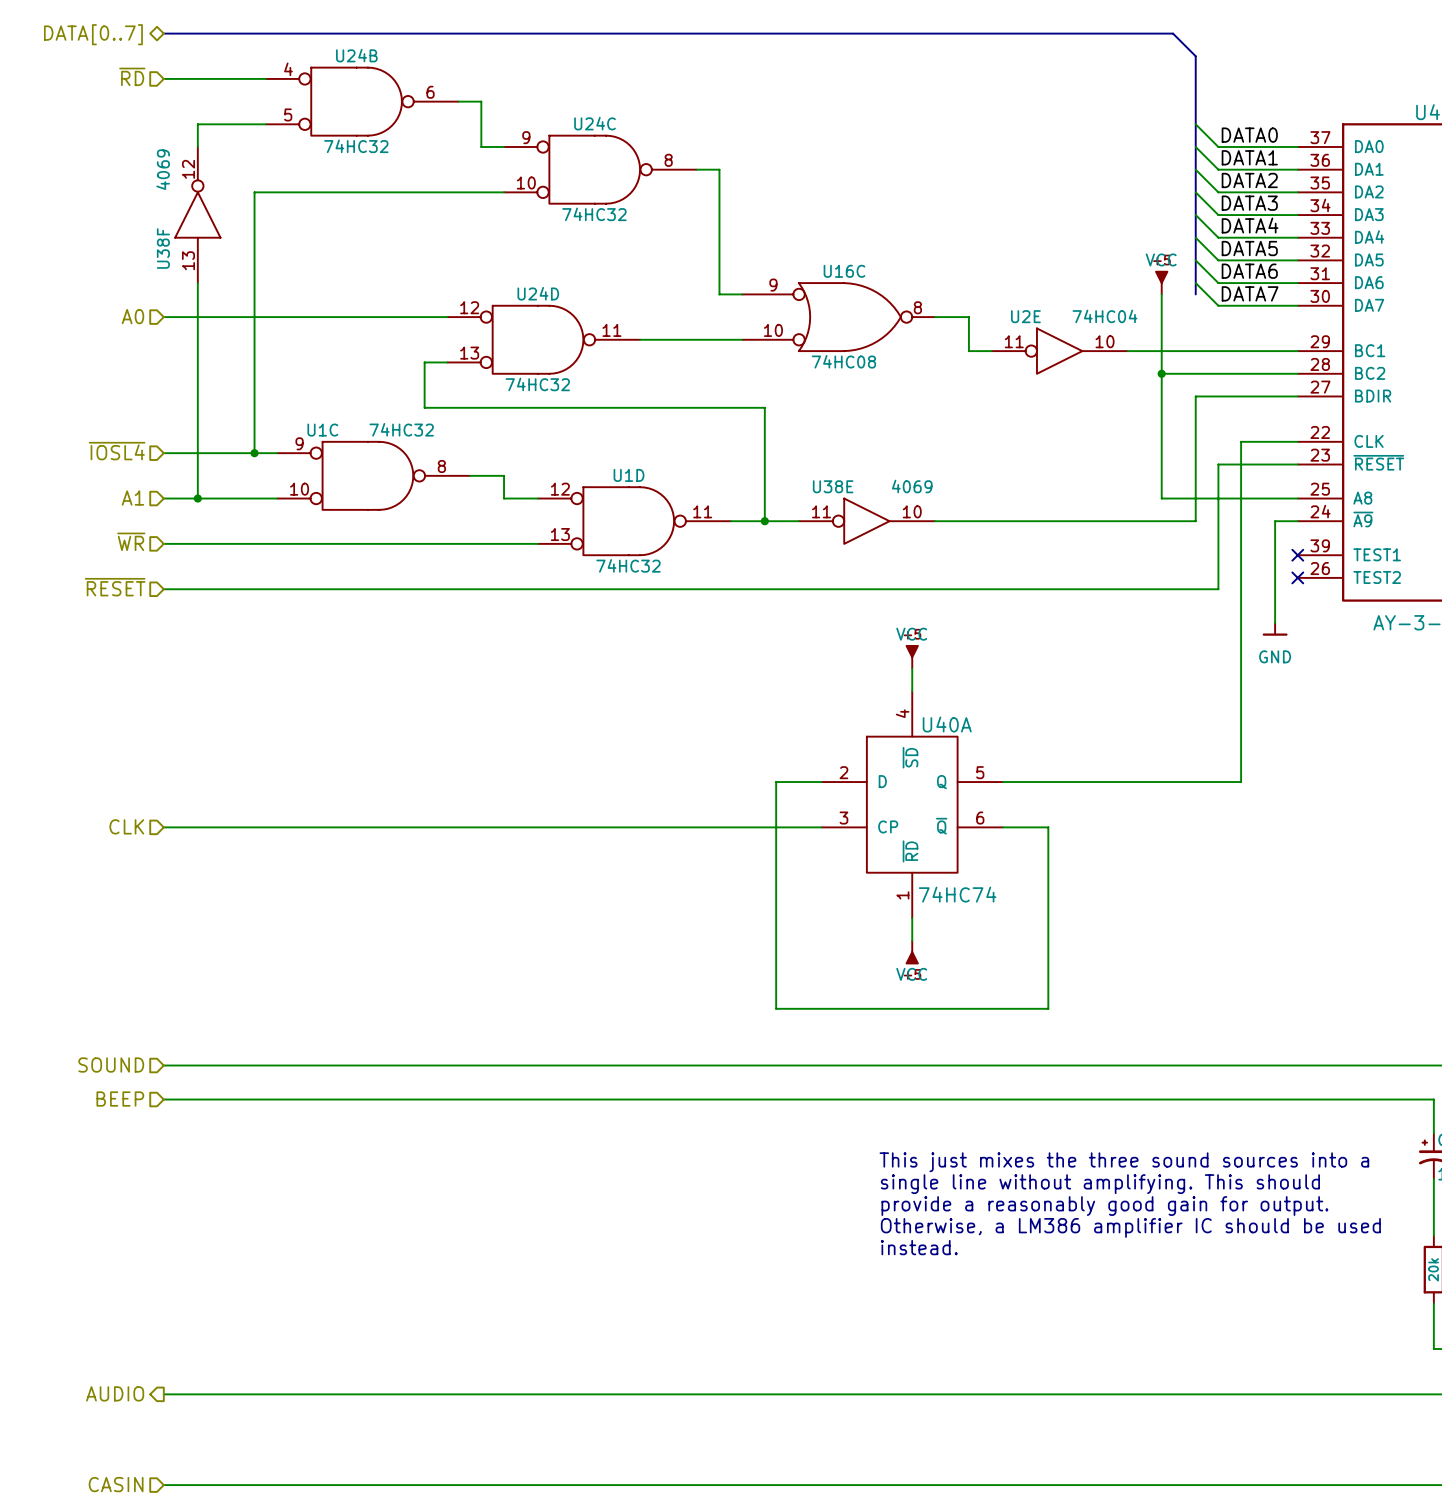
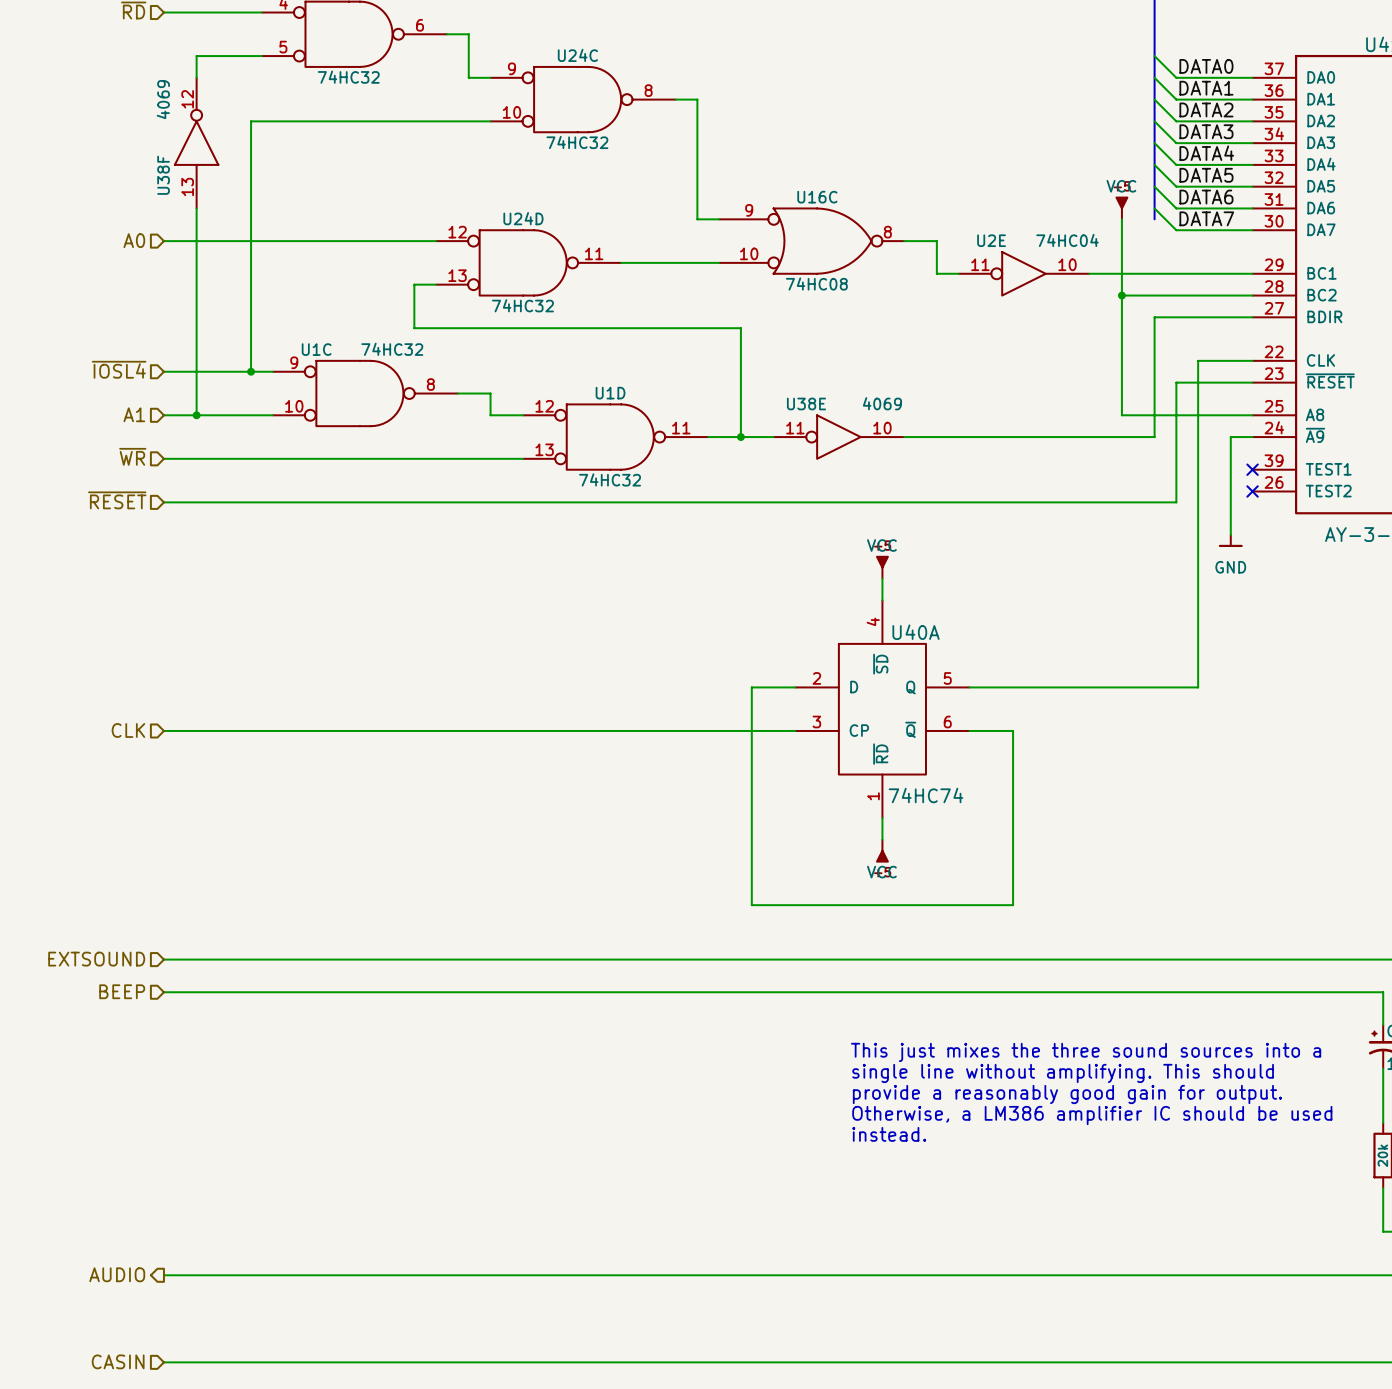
hierarchical label: SOUND (111, 1065) -> EXTSOUND (96, 959)

